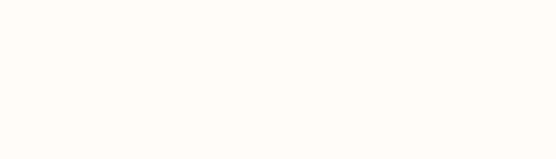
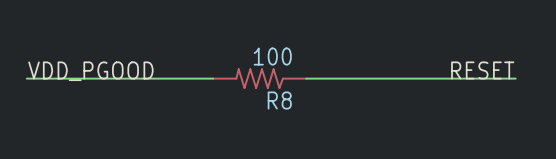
label: none -> RESET (482, 70)
label: none -> VDD_PGOOD (90, 71)
wire: none -> (26, 78) (213, 78)
R8: none -> 100 (259, 78)
wire: none -> (306, 78) (515, 78)

